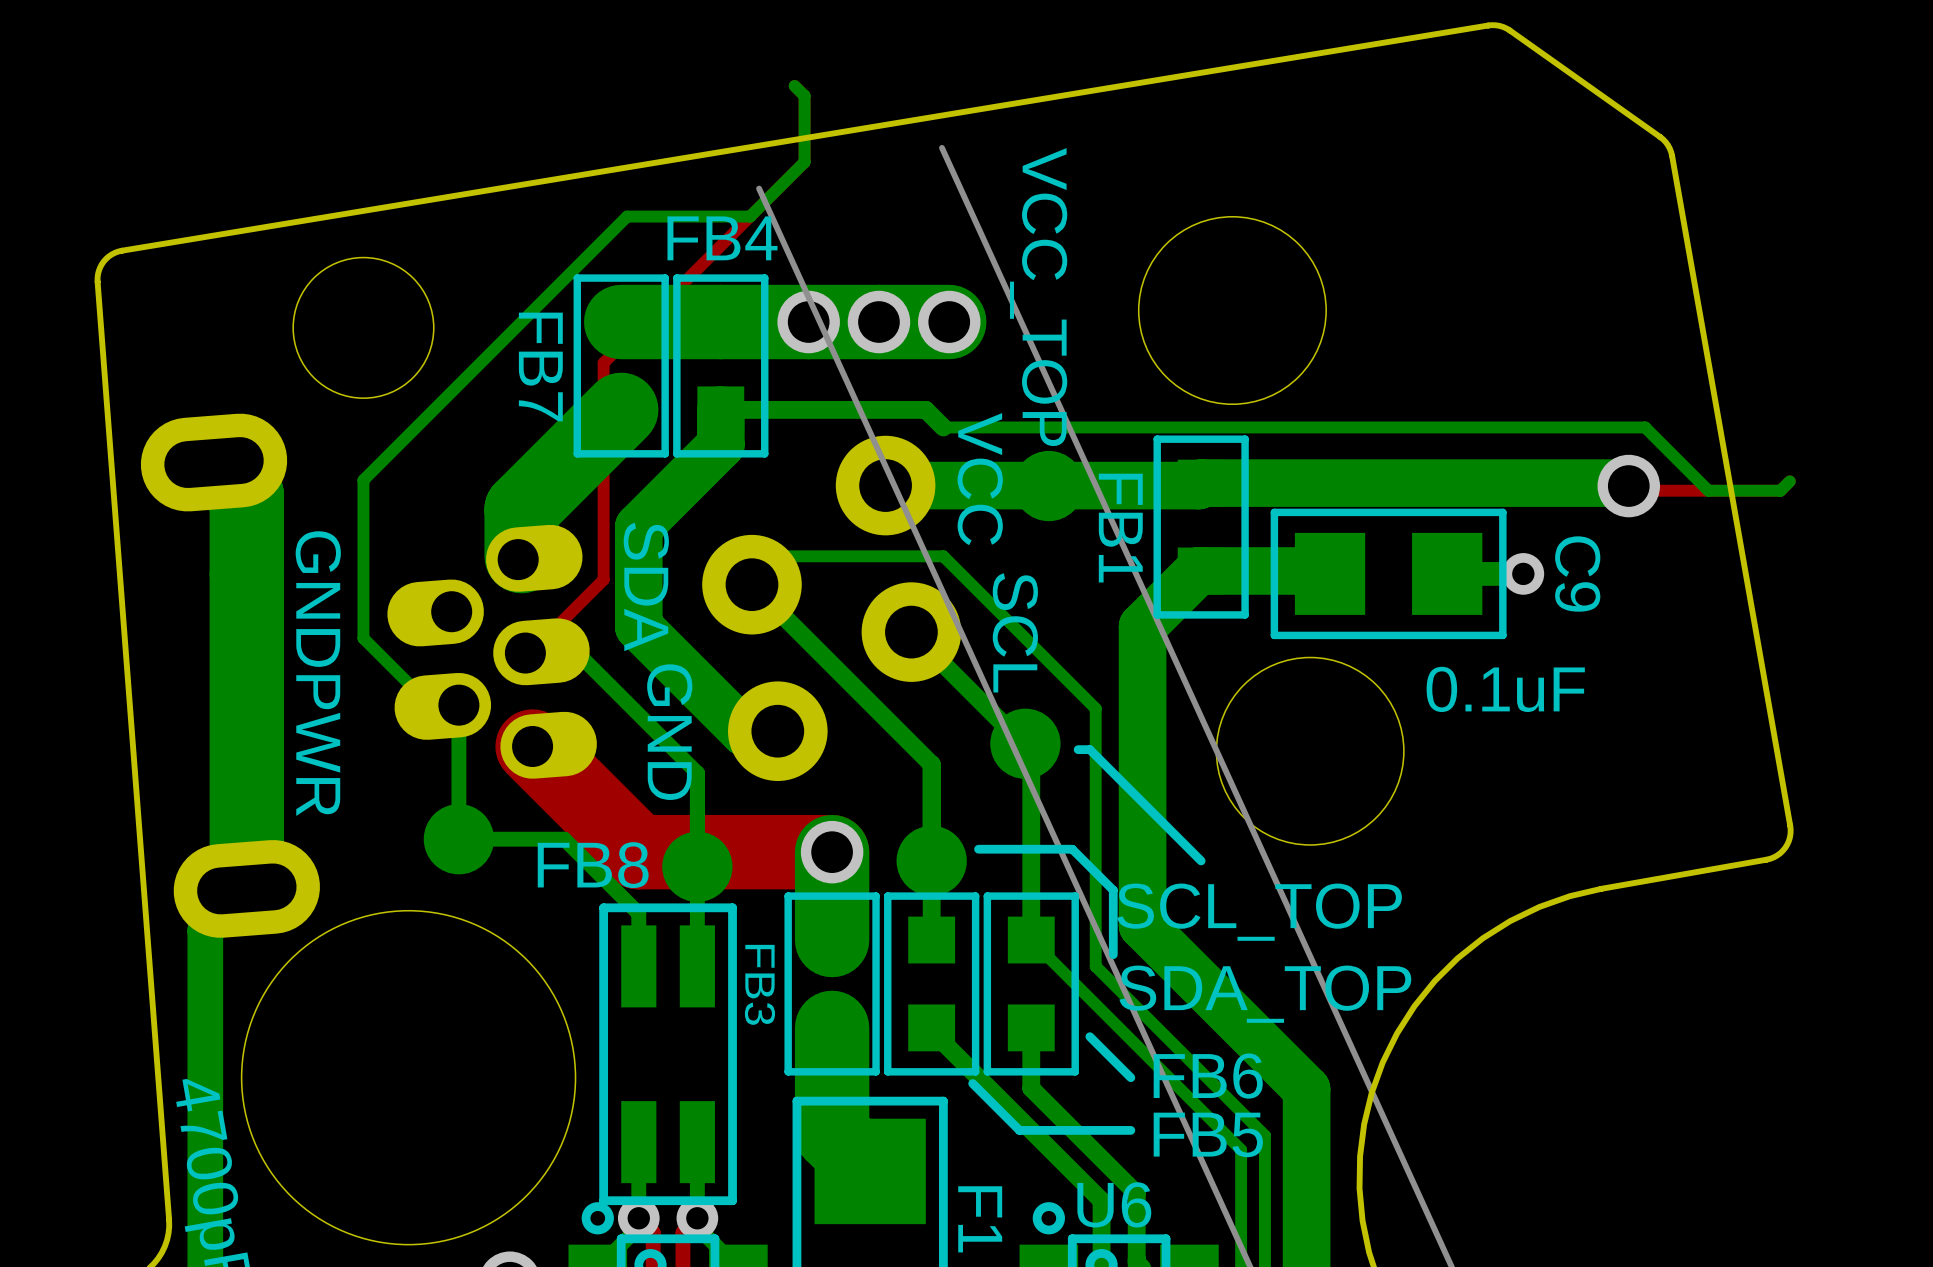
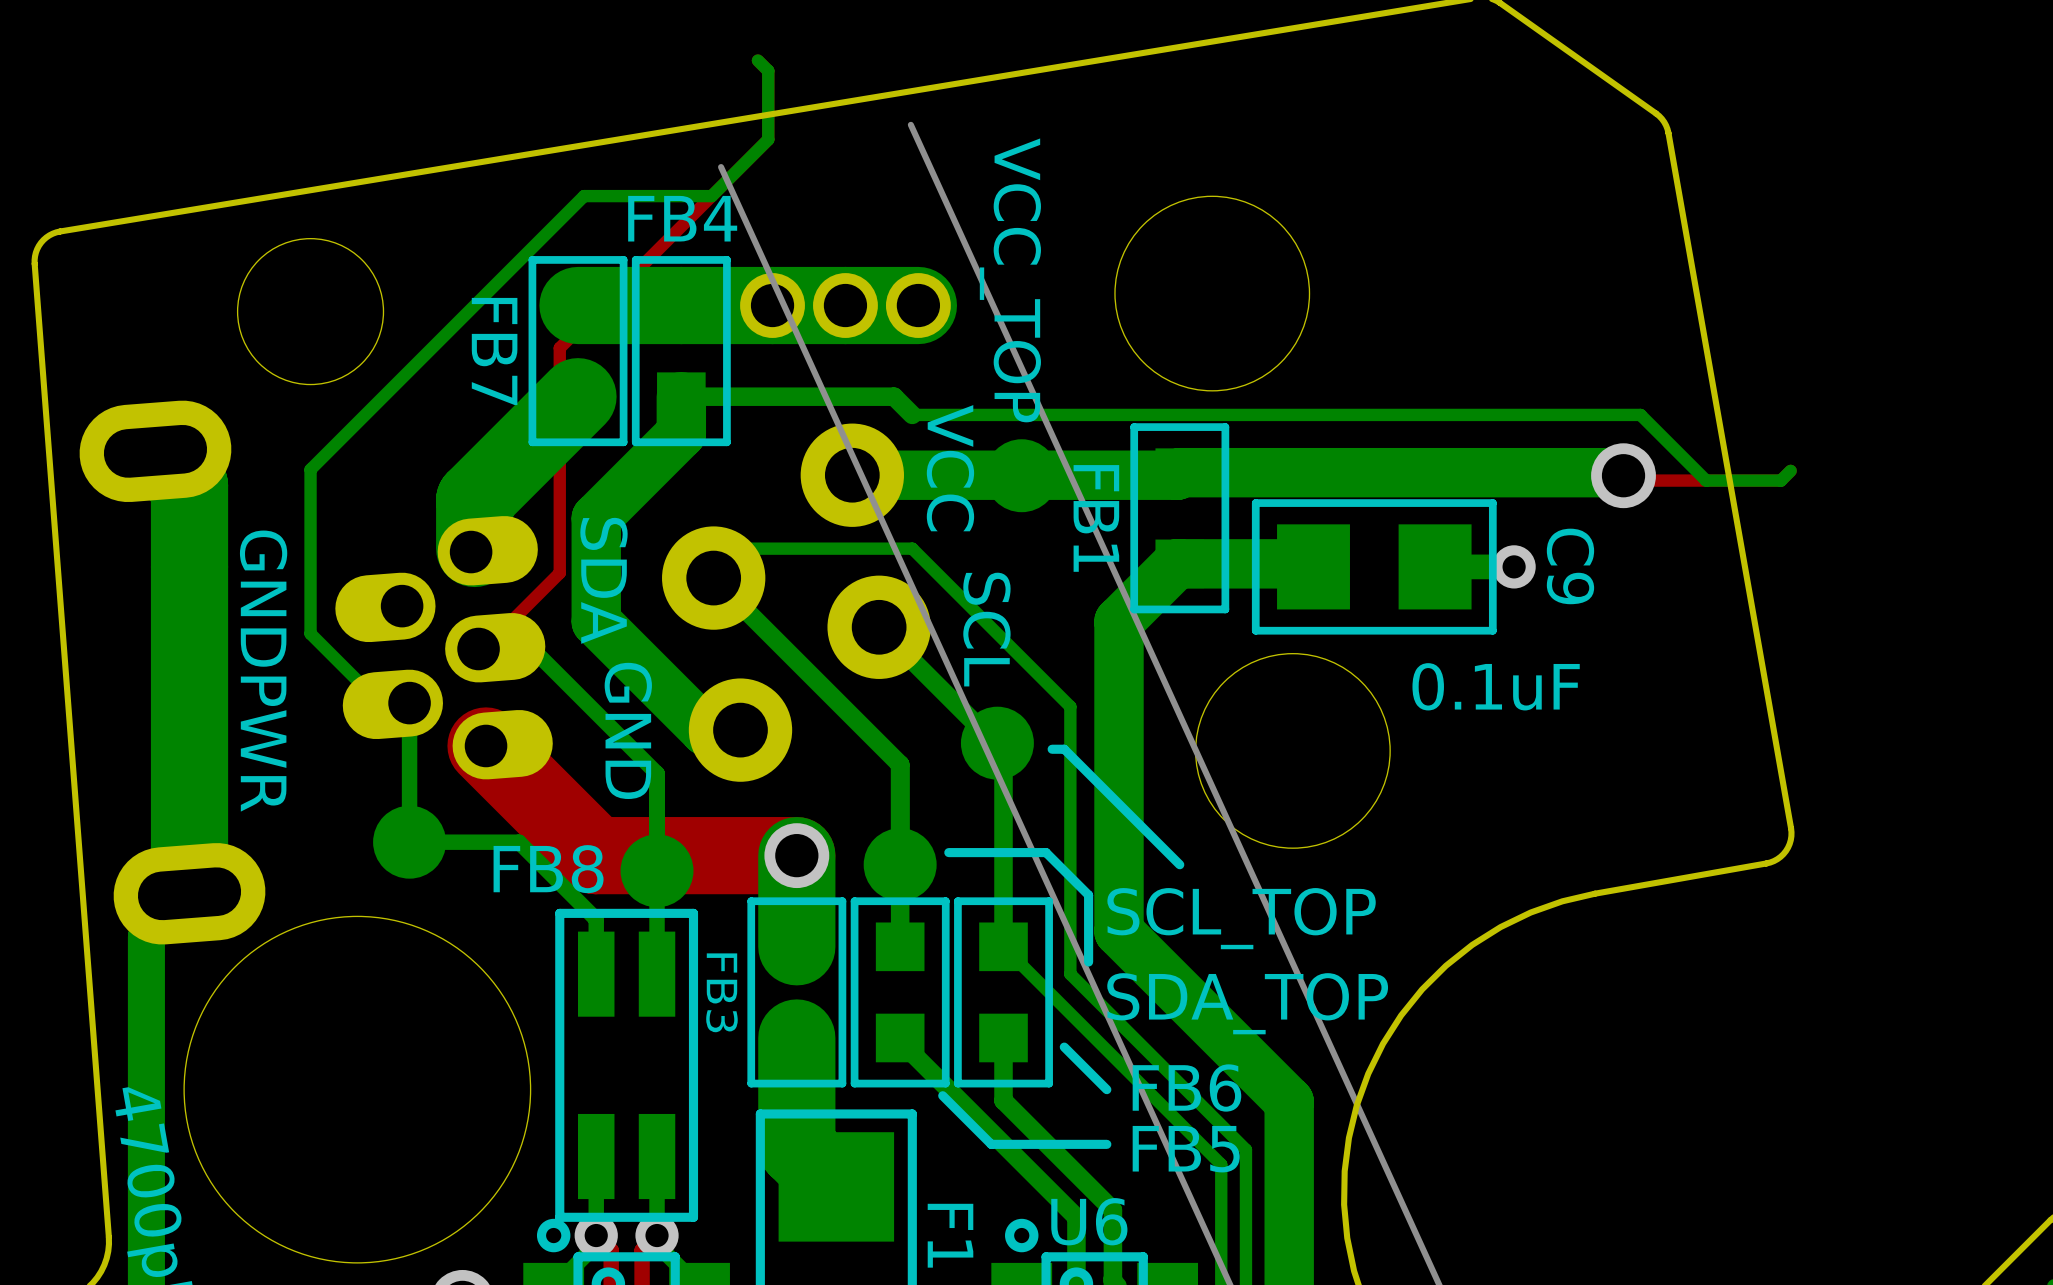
via: (808, 322) -> none
part: none -> (772, 305)
via: (878, 322) -> none
part: none -> (845, 305)
via: (949, 322) -> none
part: none -> (918, 305)

